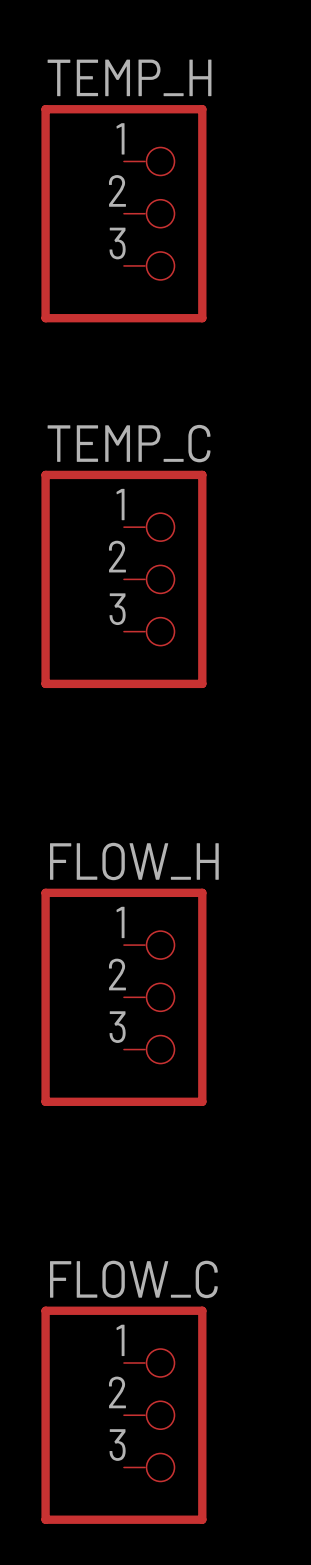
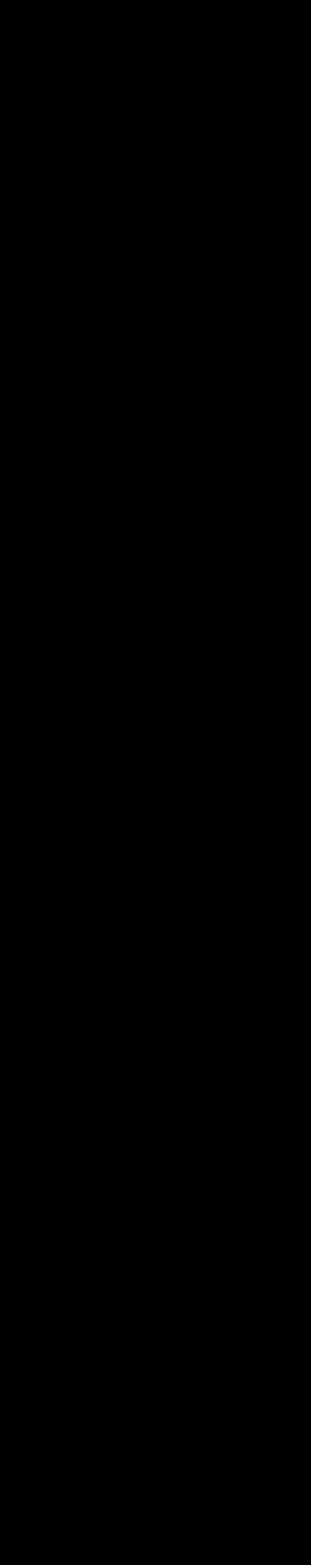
TEMP_H: (123, 213) -> none
TEMP_C: (123, 579) -> none
FLOW_H: (123, 997) -> none
FLOW_C: (123, 1415) -> none

